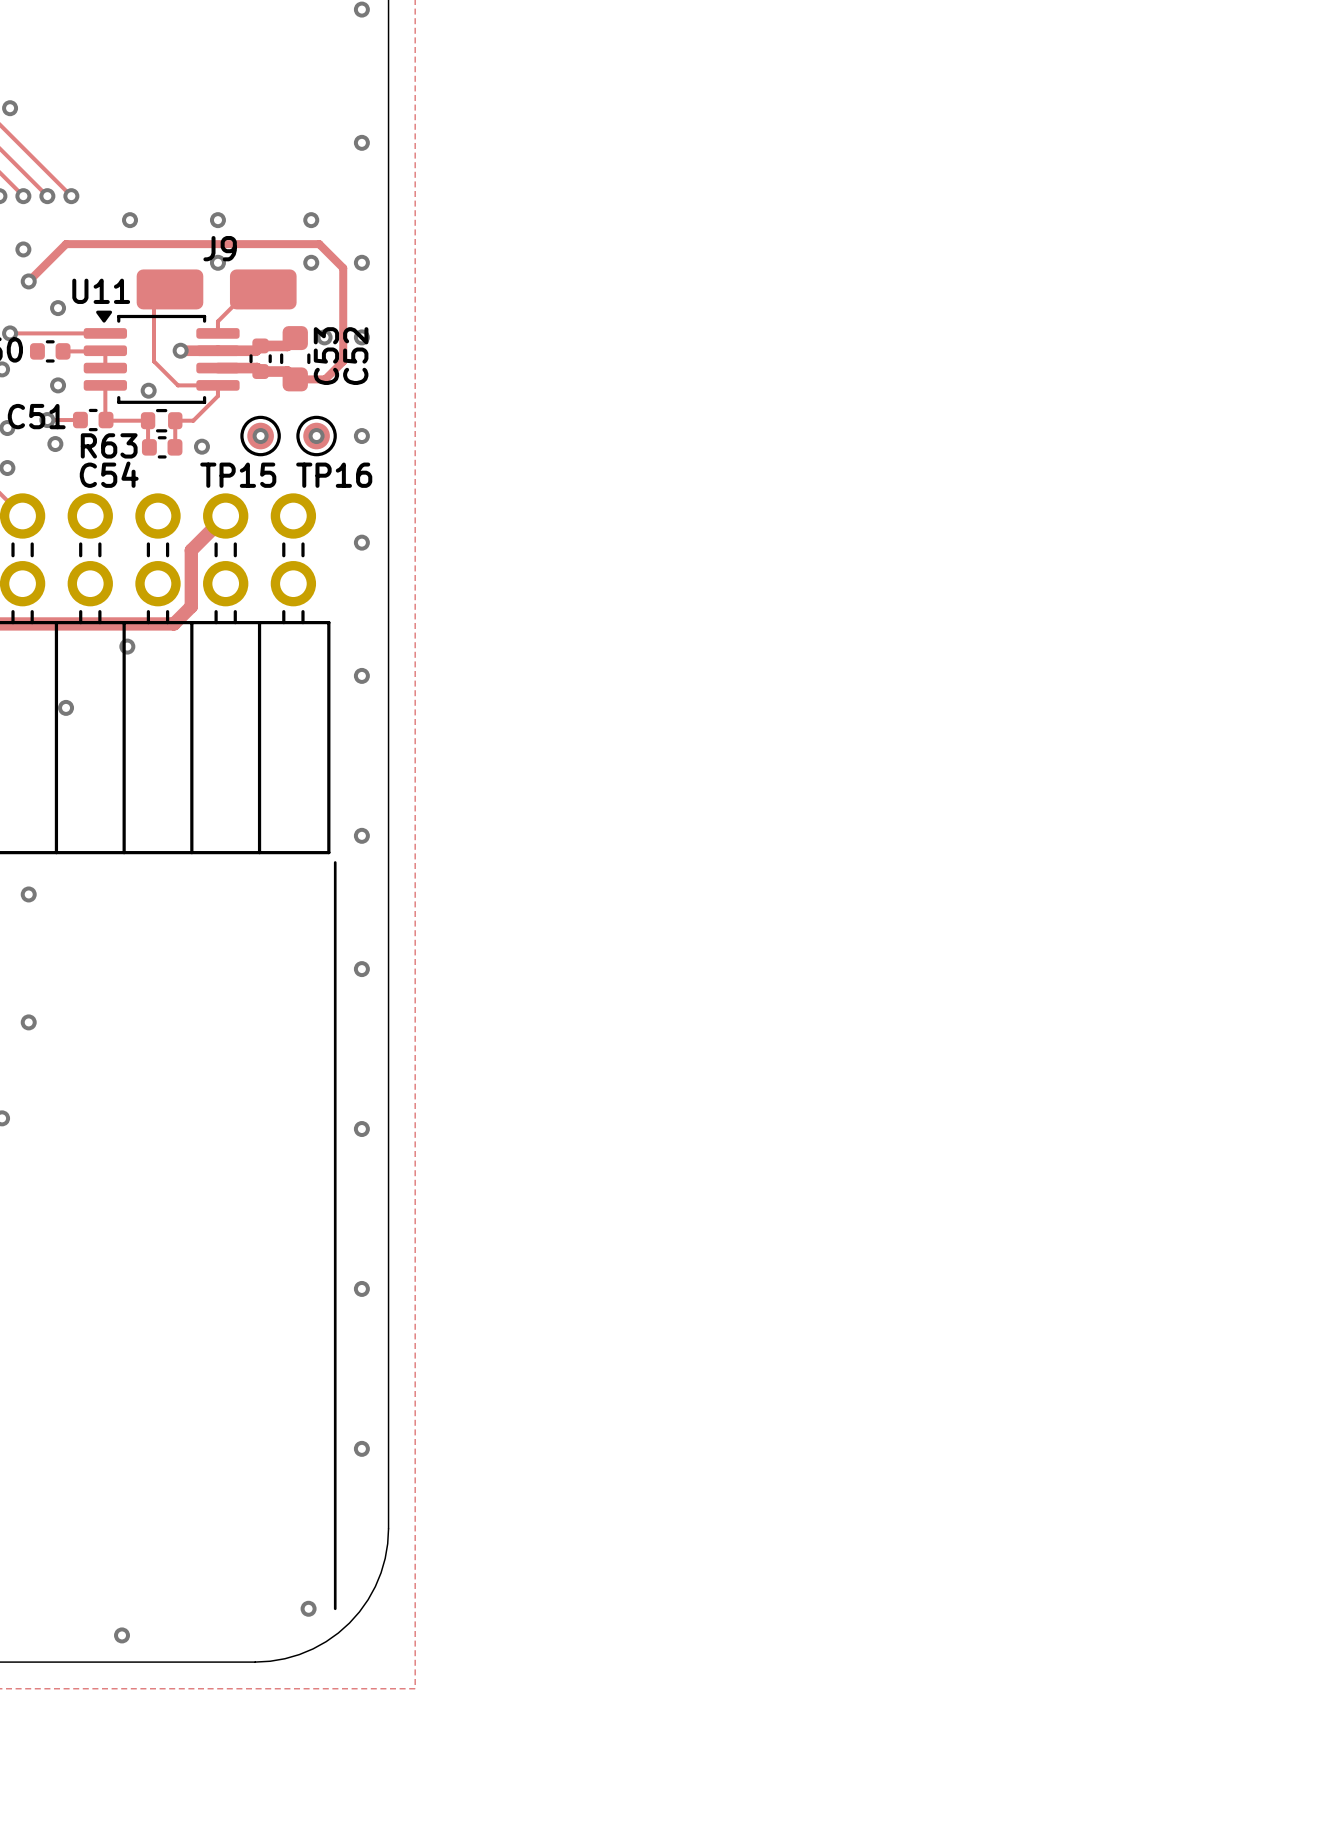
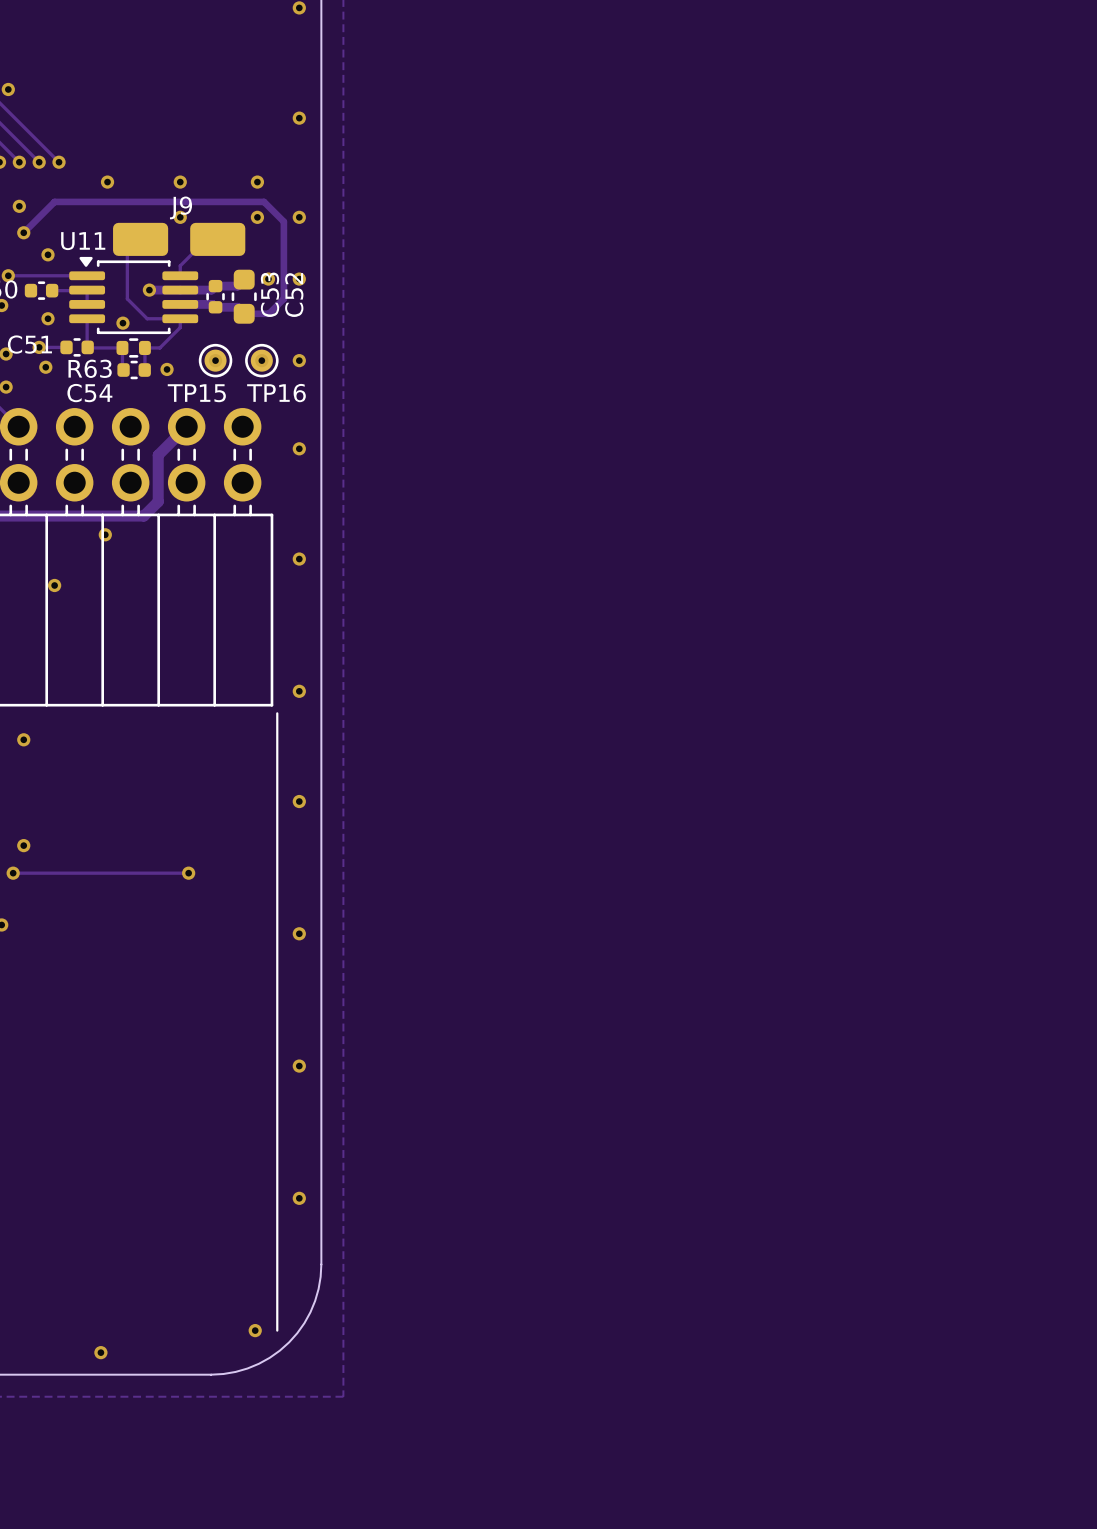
track: none -> (13, 873) (188, 873)
via: none -> (13, 873)
via: none -> (188, 873)

